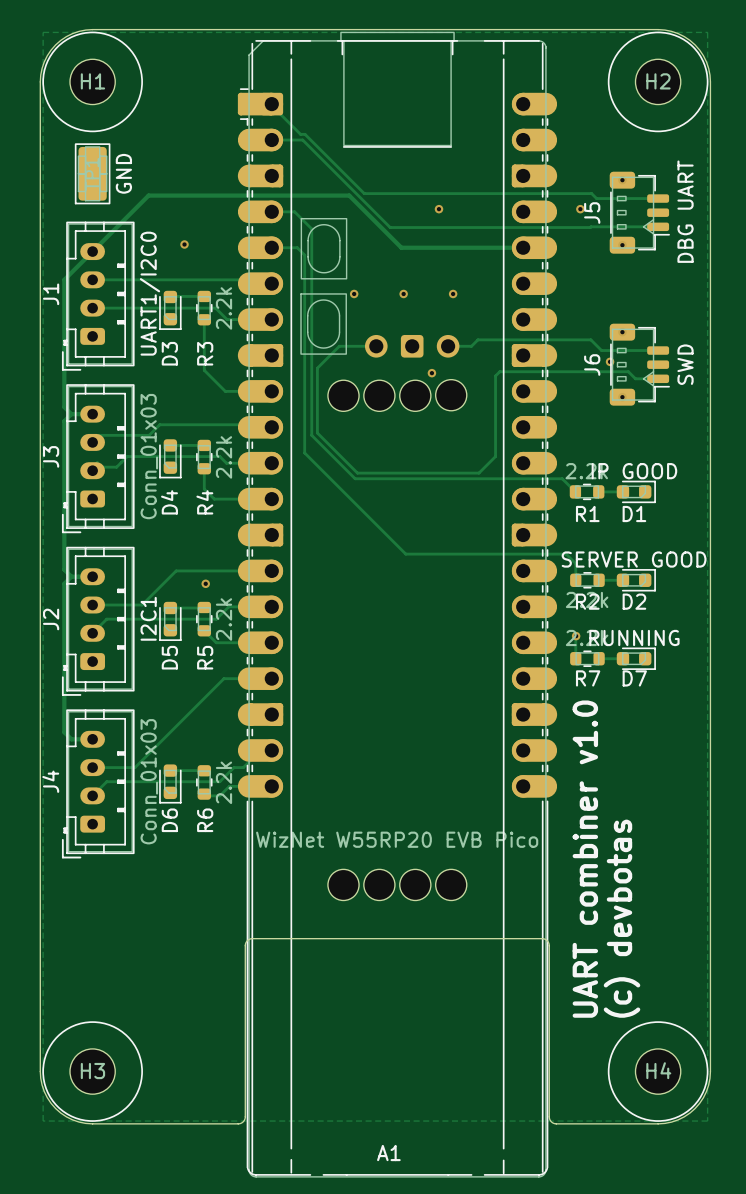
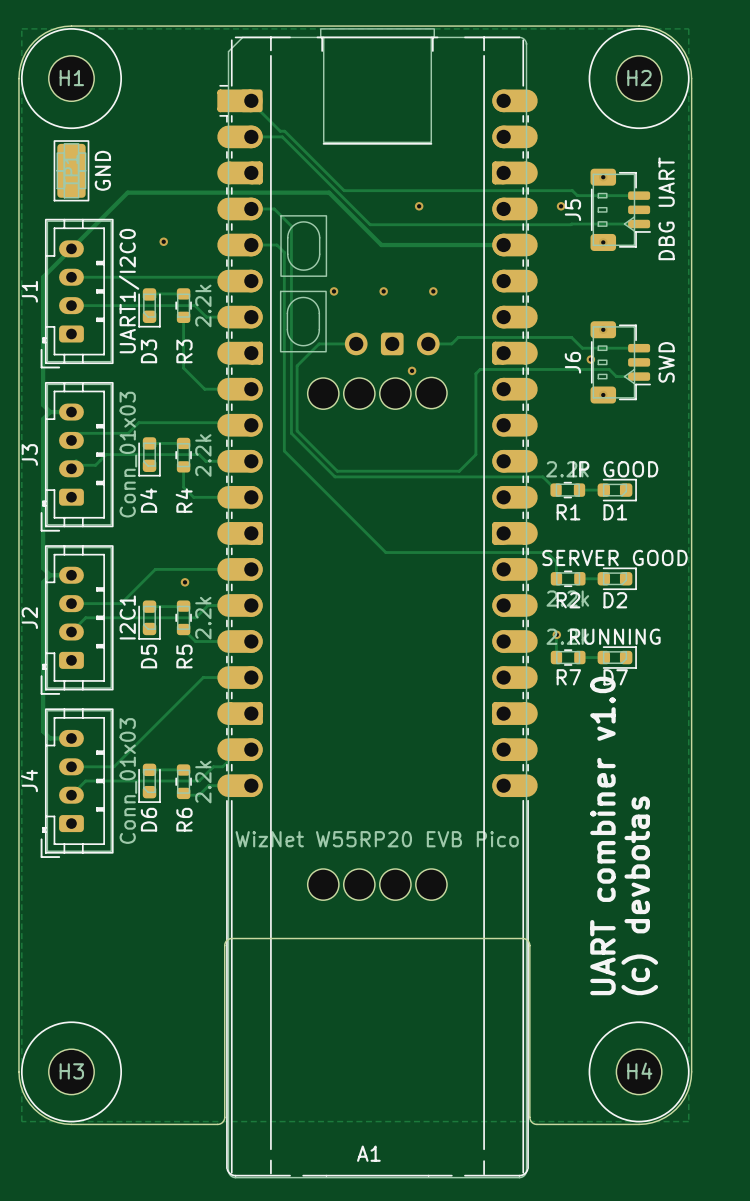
text position: UART combiner v1.0 (585, 859) -> UART combiner v1.0 (602, 835)
text position: (c) devbotas (622, 918) -> (c) devbotas (639, 895)

